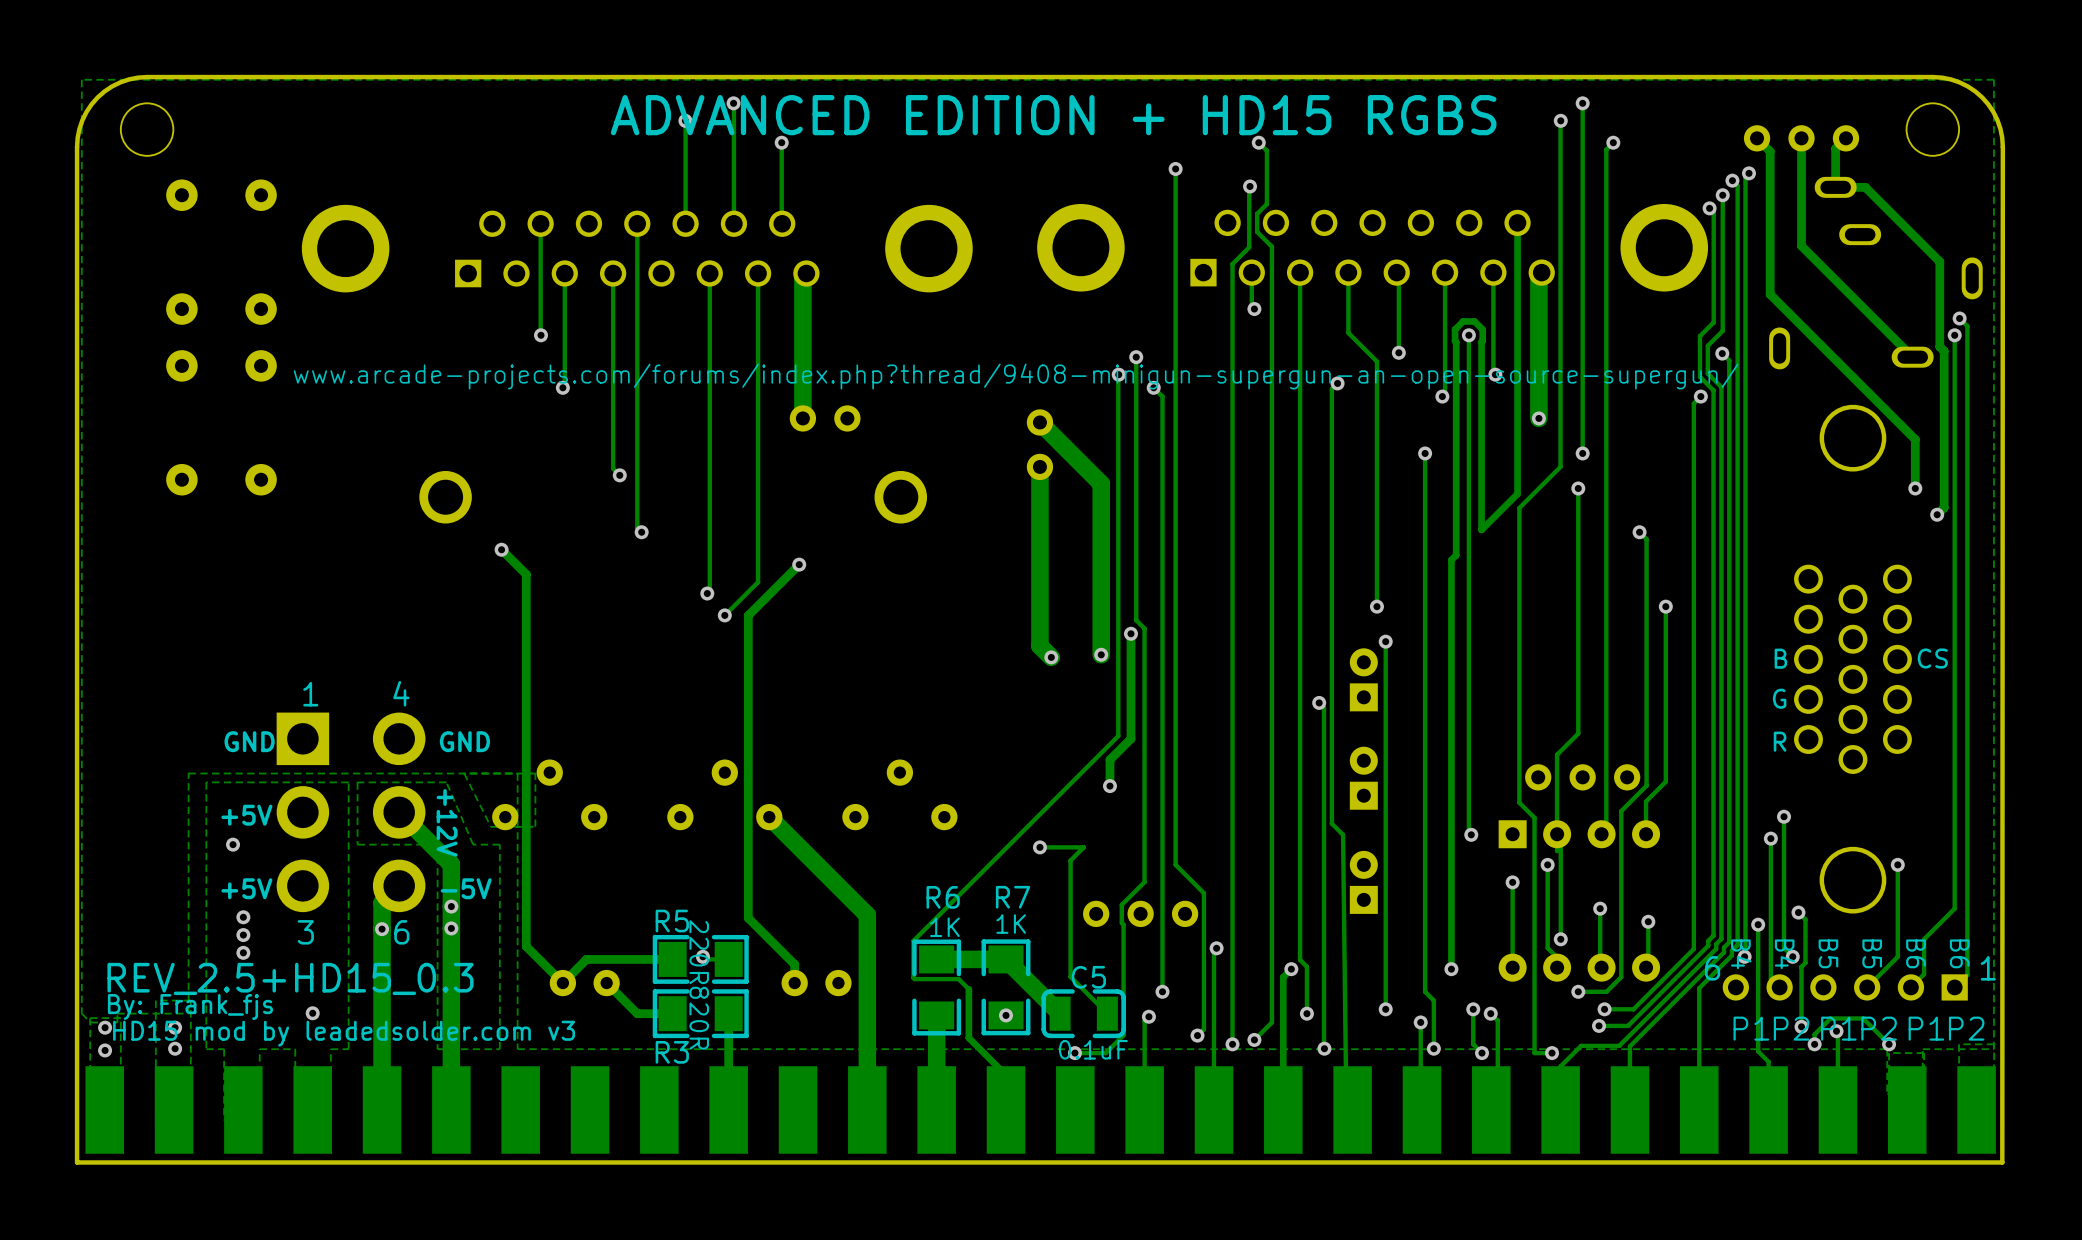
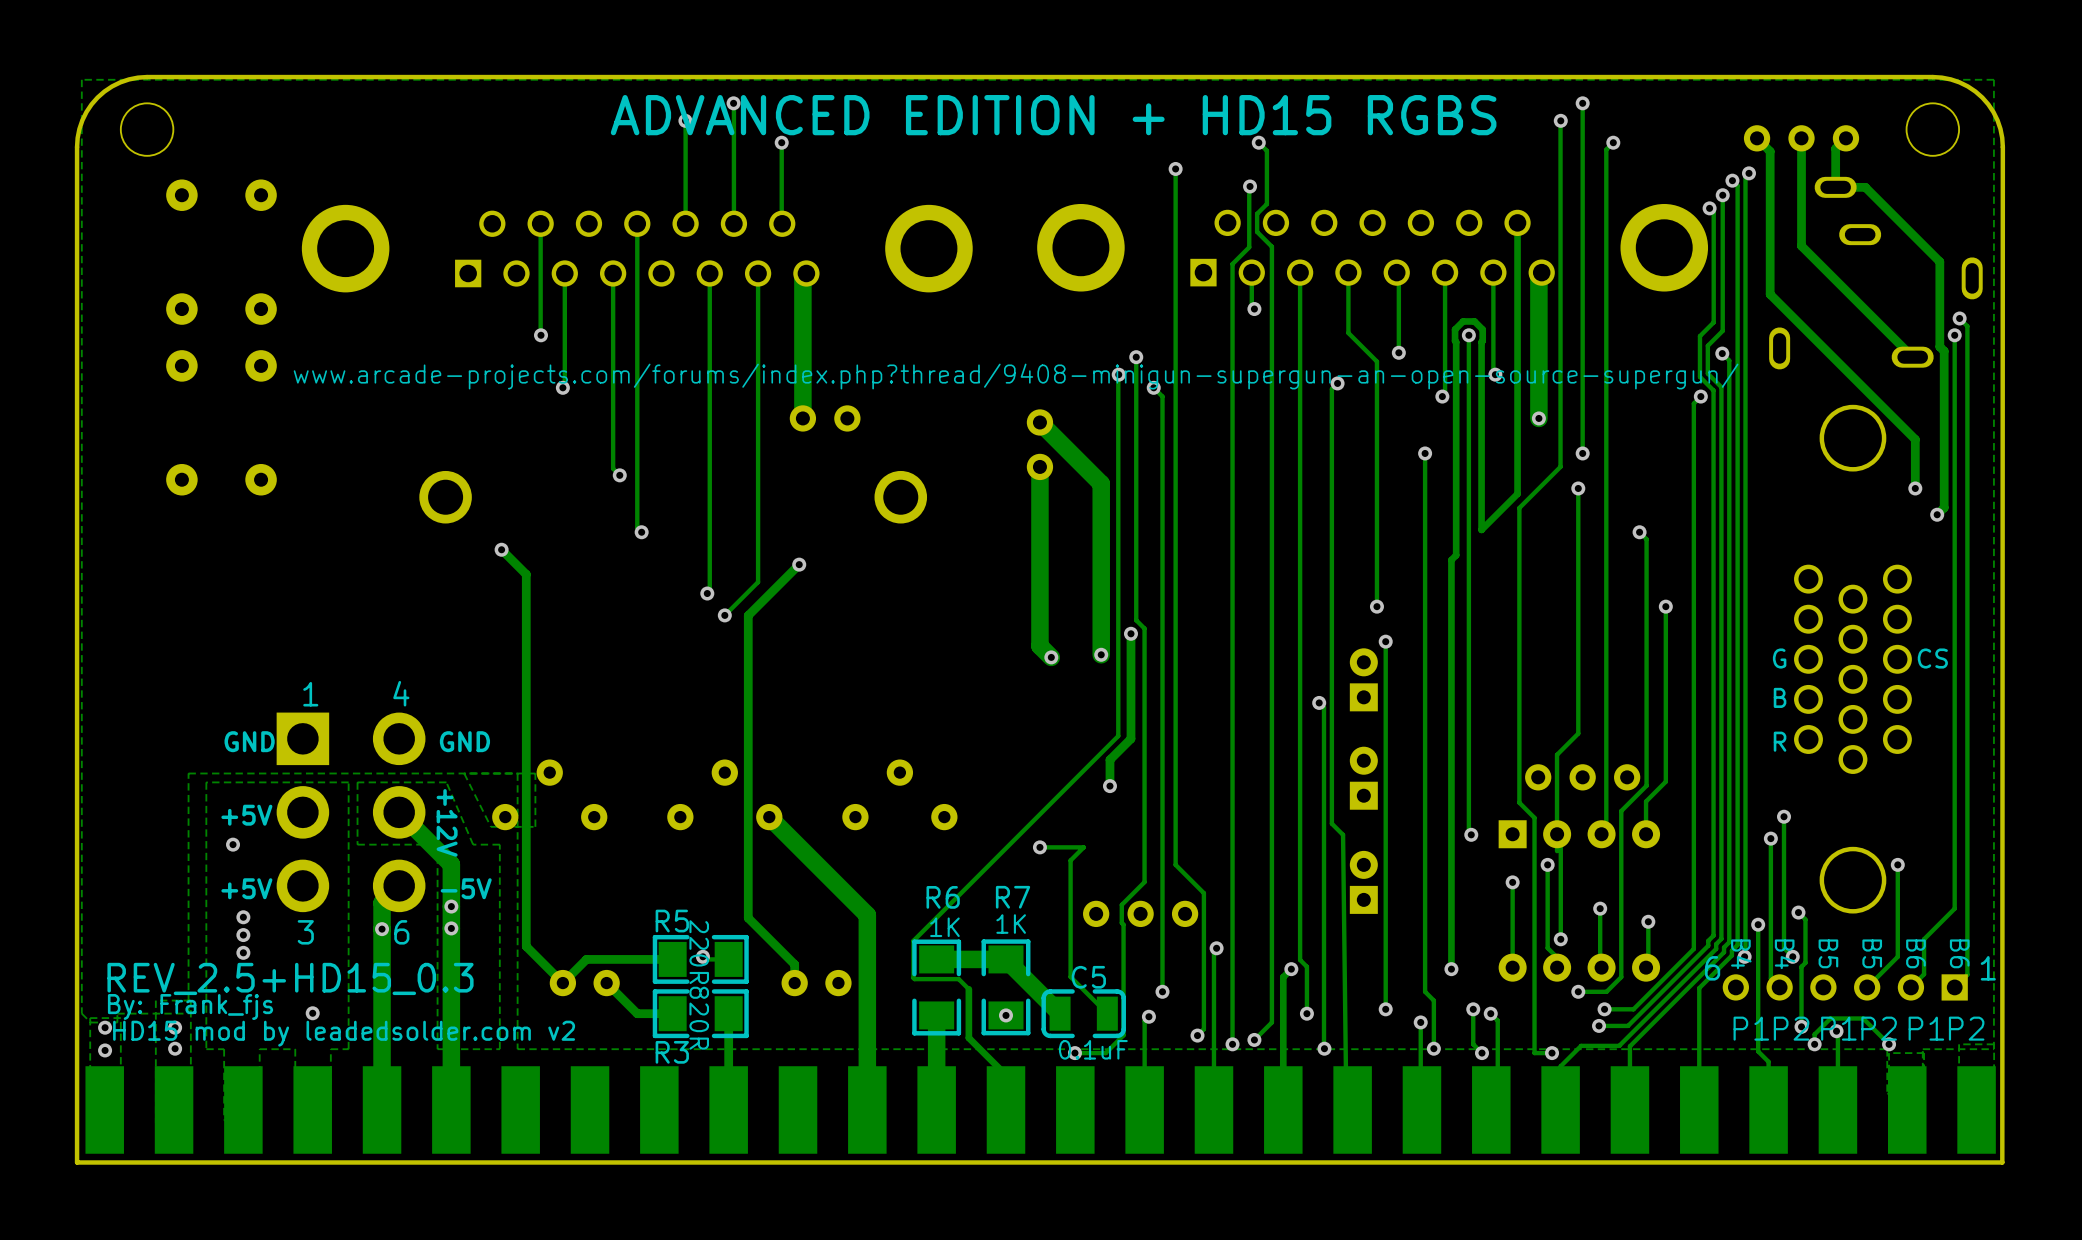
text: B (1780, 658) -> G (1779, 658)
text: G (1779, 698) -> B (1780, 697)
text: HD15 mod by leadedsolder.com v3 (344, 1033) -> HD15 mod by leadedsolder.com v2 (344, 1033)

